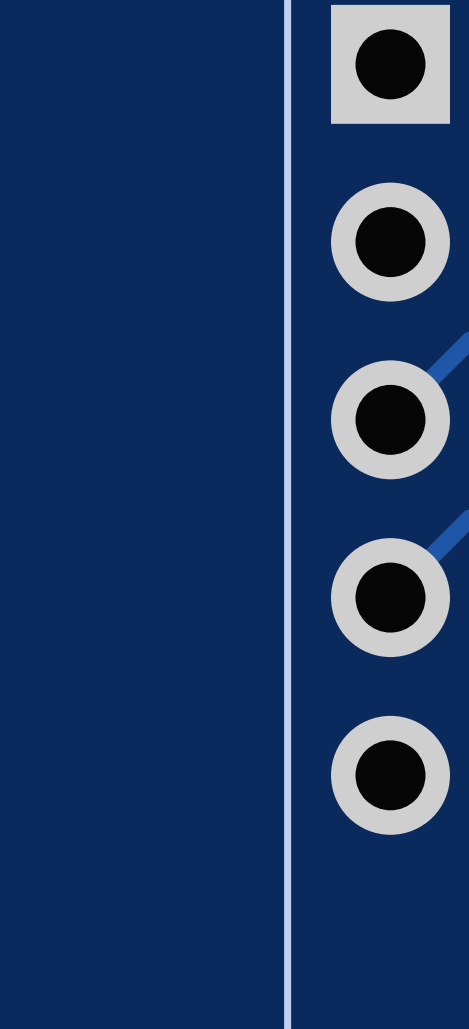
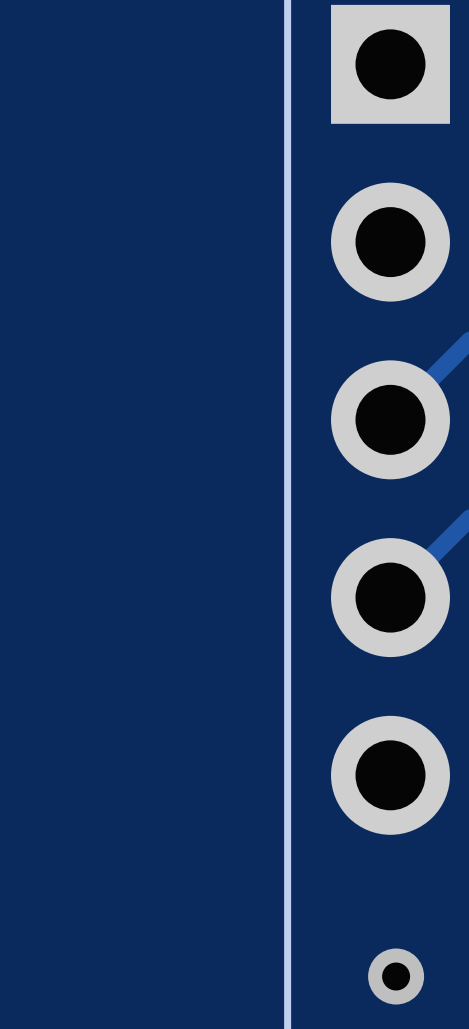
via: none -> (396, 976)

